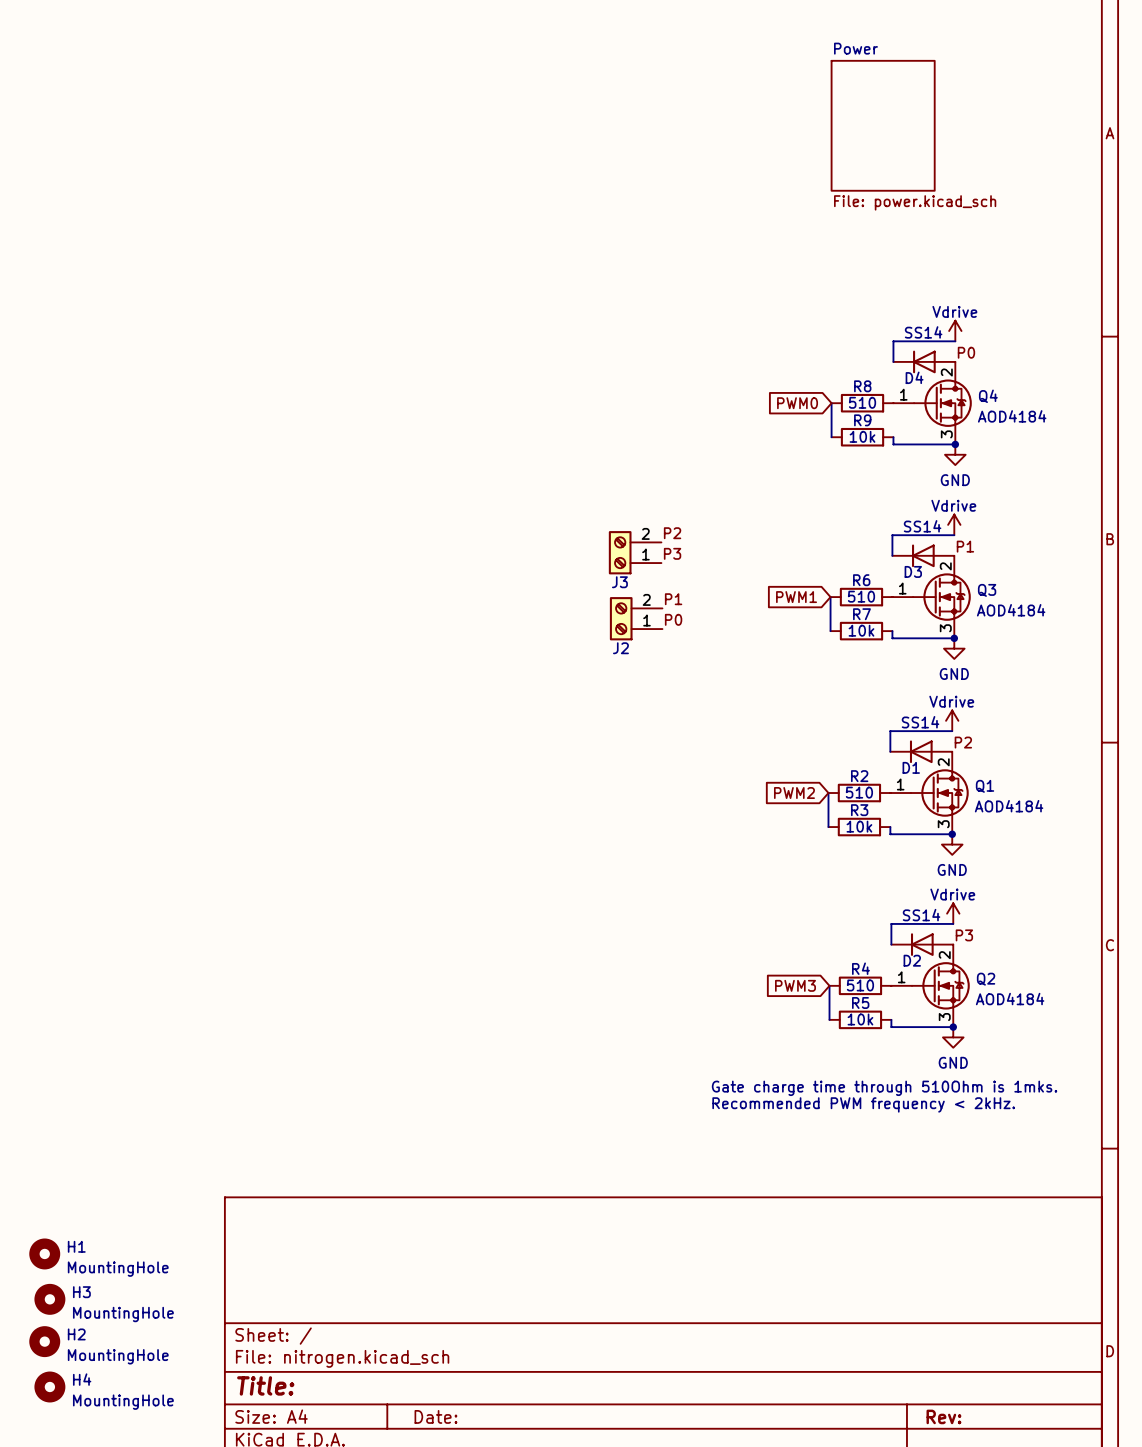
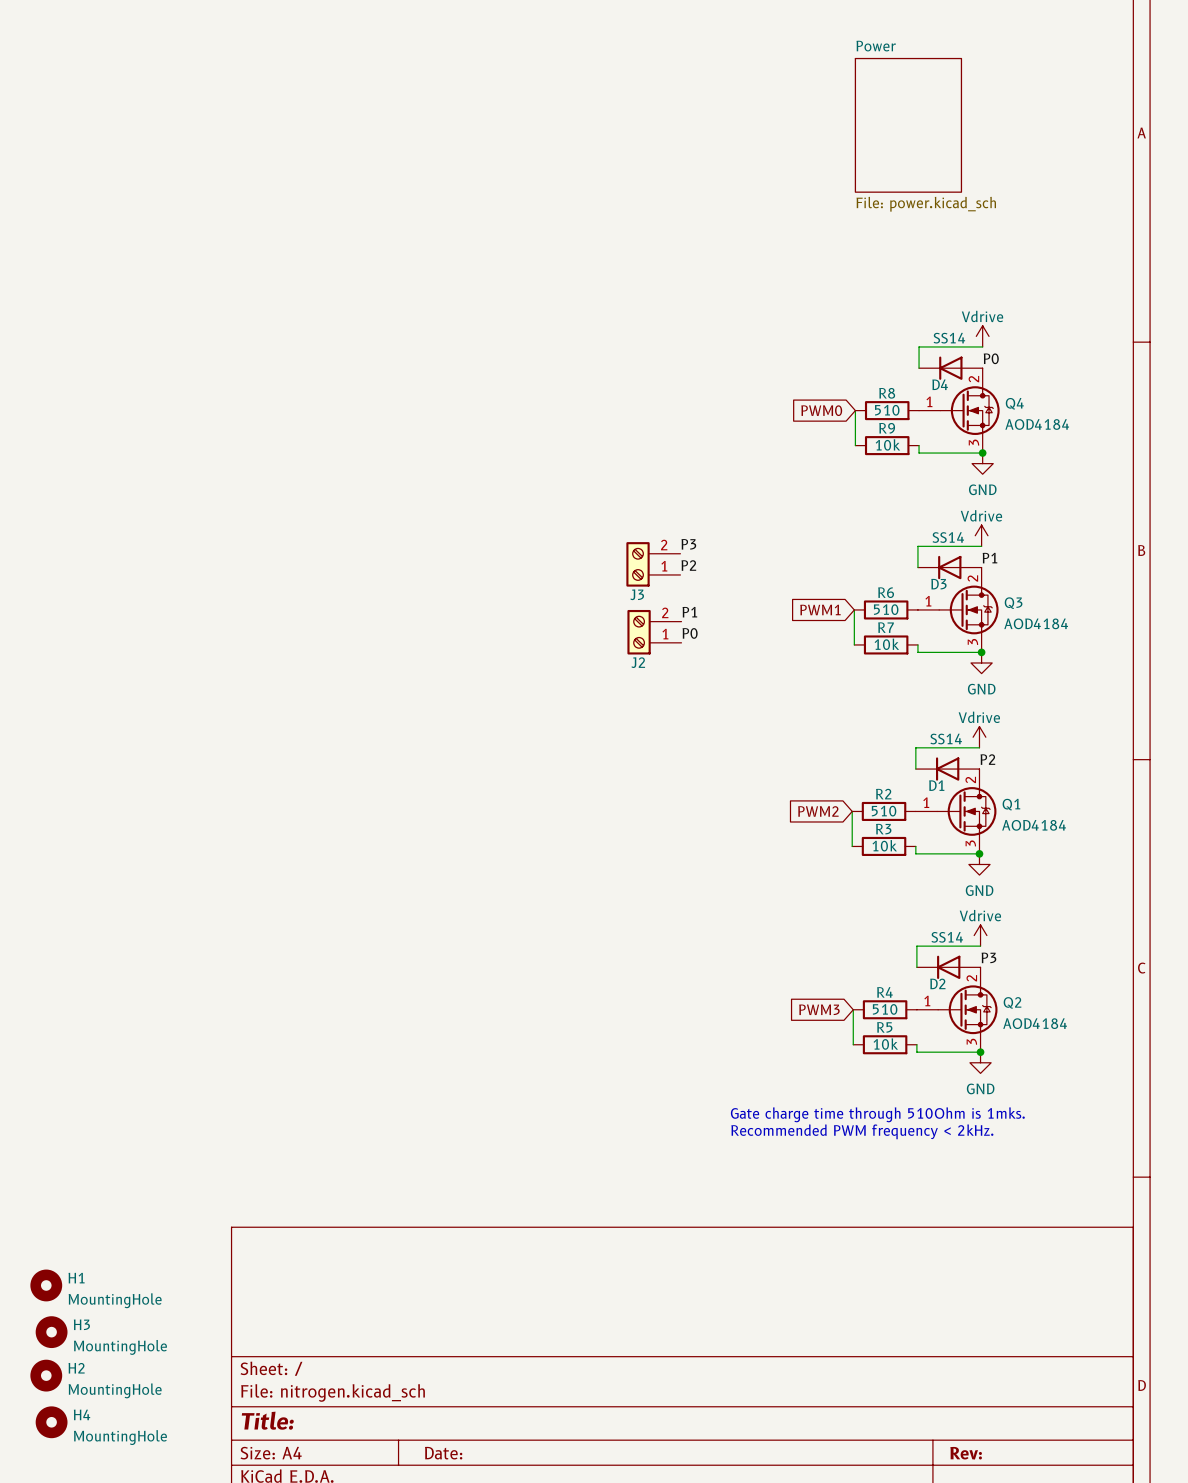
label: P2 (672, 533) -> P3 (688, 544)
label: P3 (672, 553) -> P2 (688, 565)

